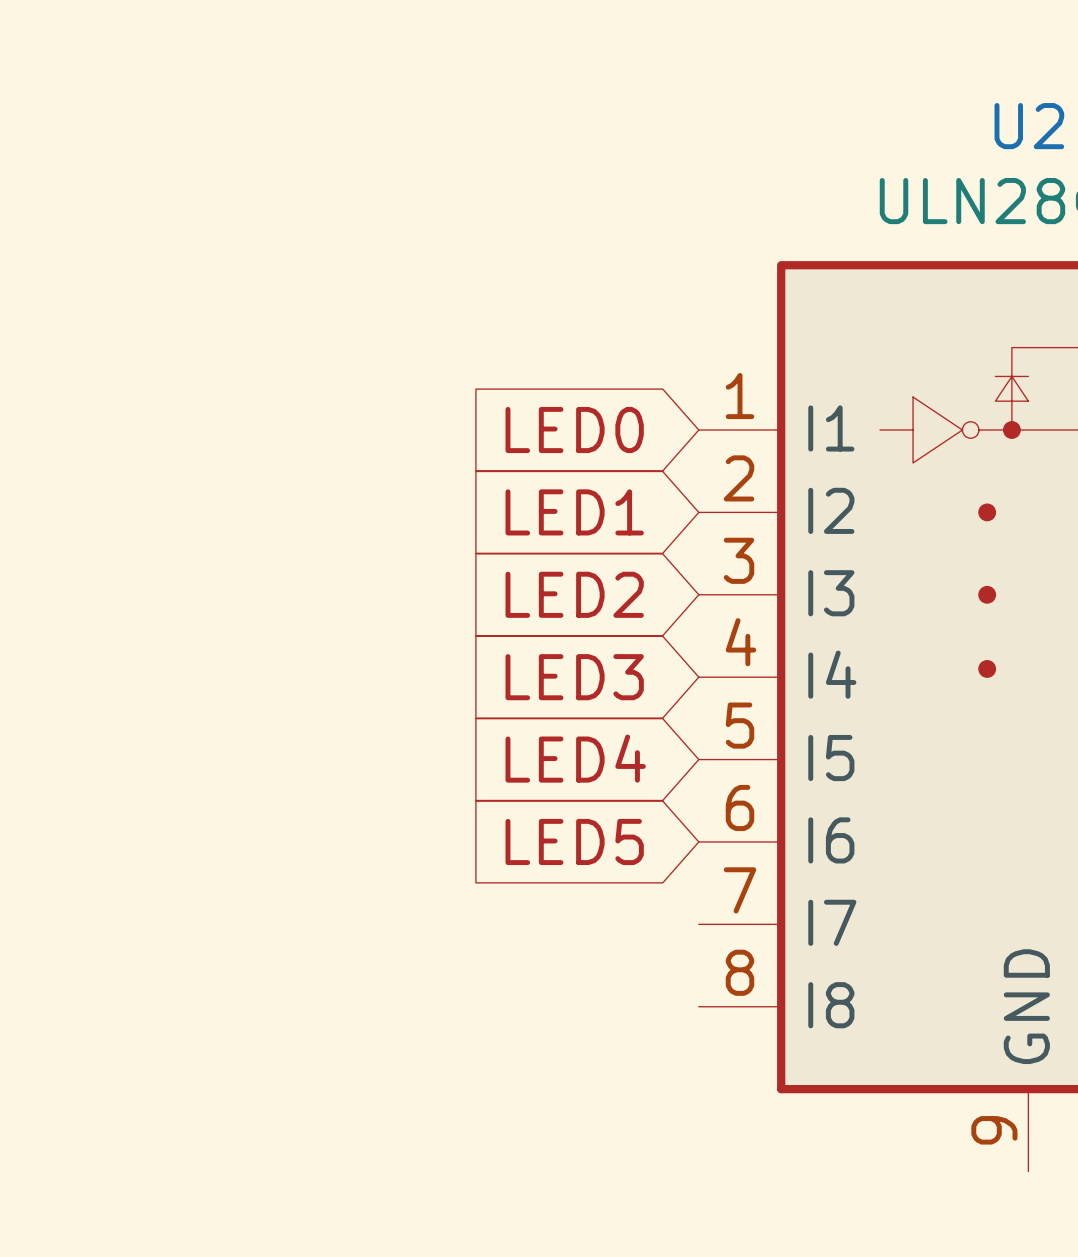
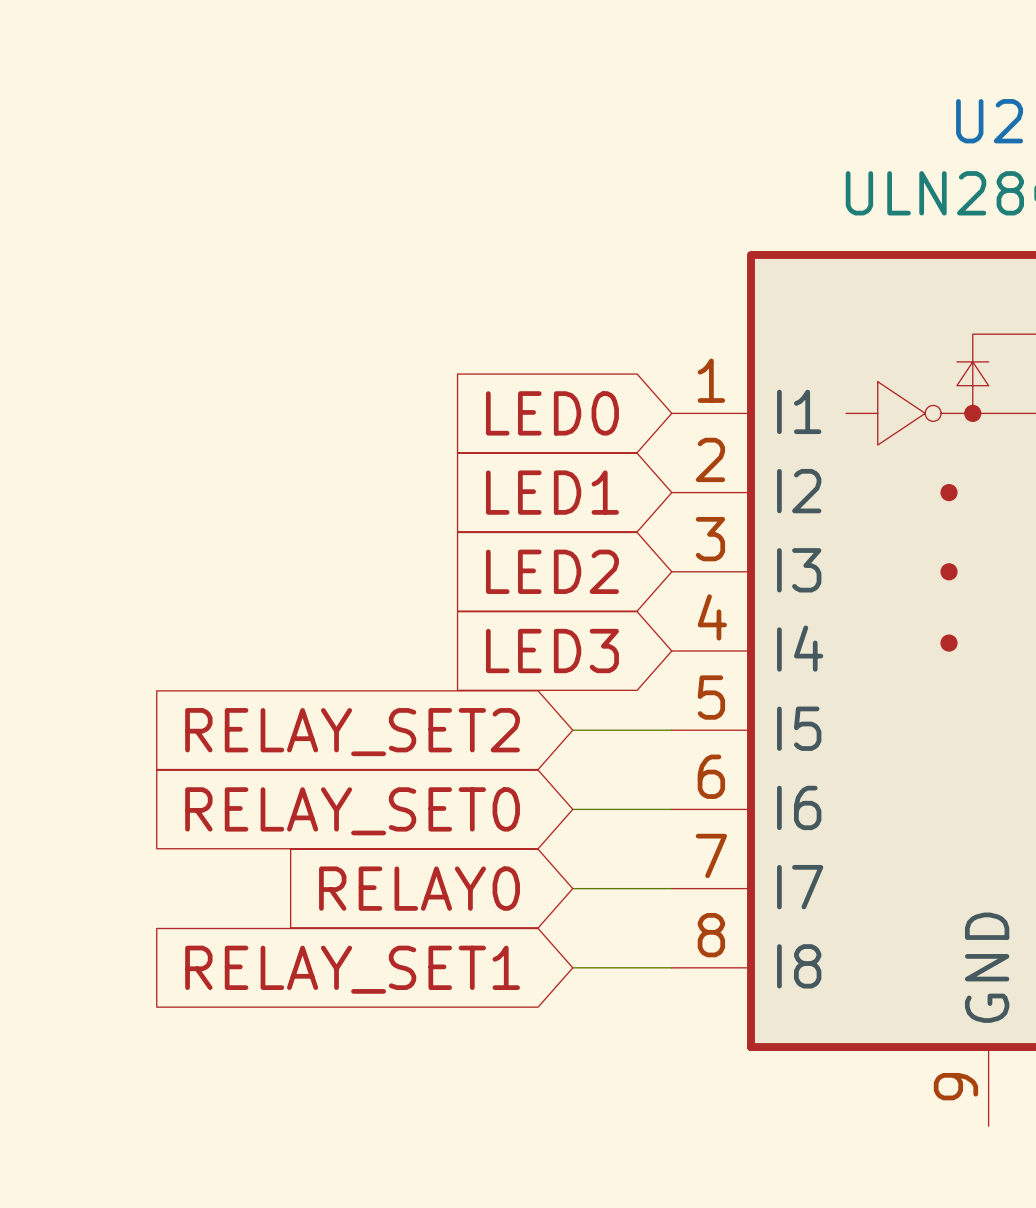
global label: LED4 (575, 758) -> none
wire: none -> (572, 730) (671, 730)
global label: none -> RELAY_SET2 (352, 732)
global label: LED5 (574, 841) -> none
wire: none -> (572, 809) (671, 809)
global label: none -> RELAY_SET0 (352, 811)
global label: none -> RELAY0 (419, 888)
wire: none -> (572, 888) (671, 888)
wire: none -> (572, 967) (671, 967)
global label: none -> RELAY_SET1 (352, 969)

